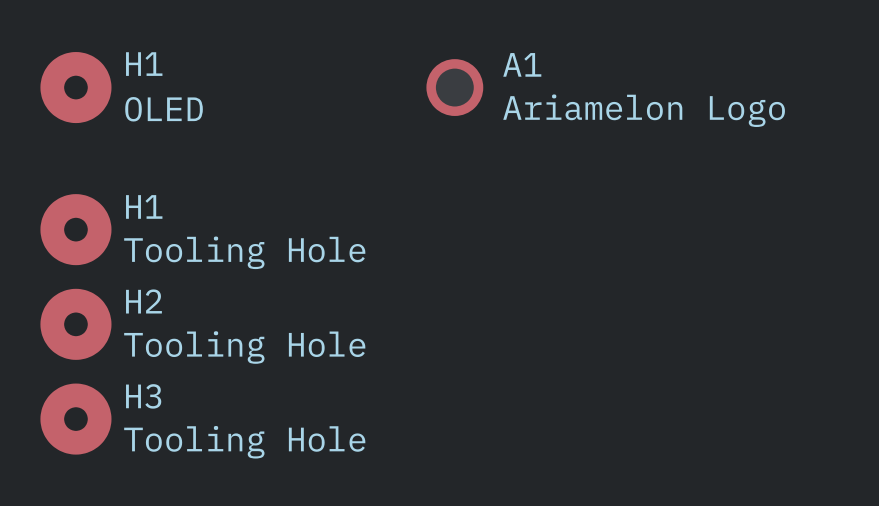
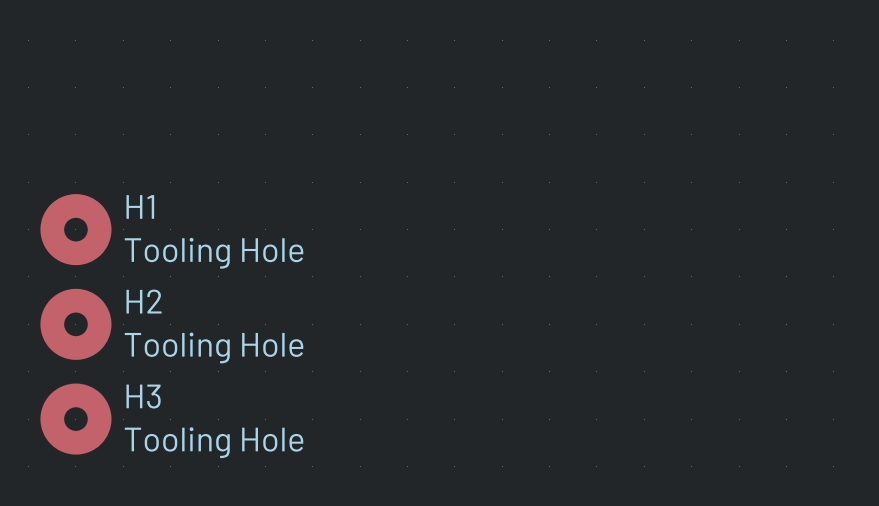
H1: OLED (75, 87) -> none
A1: Ariamelon Logo (454, 87) -> none

